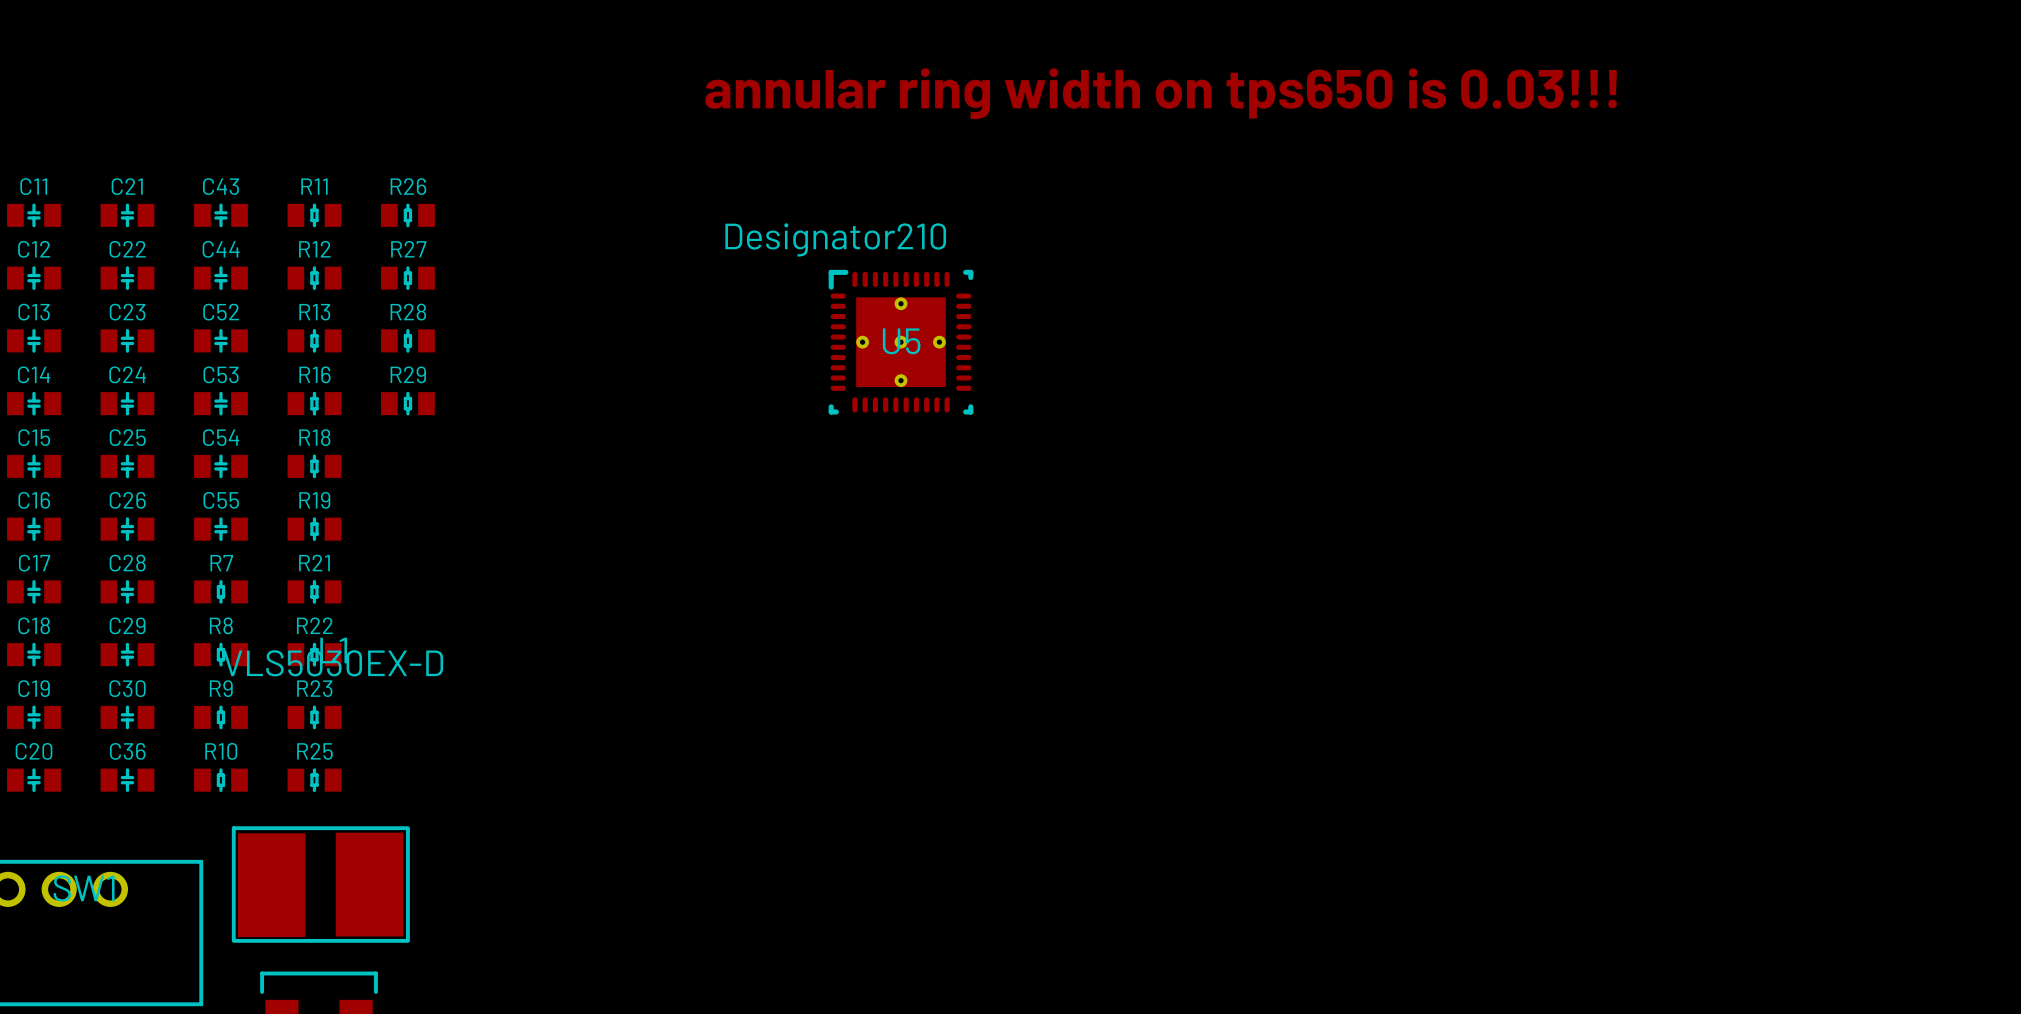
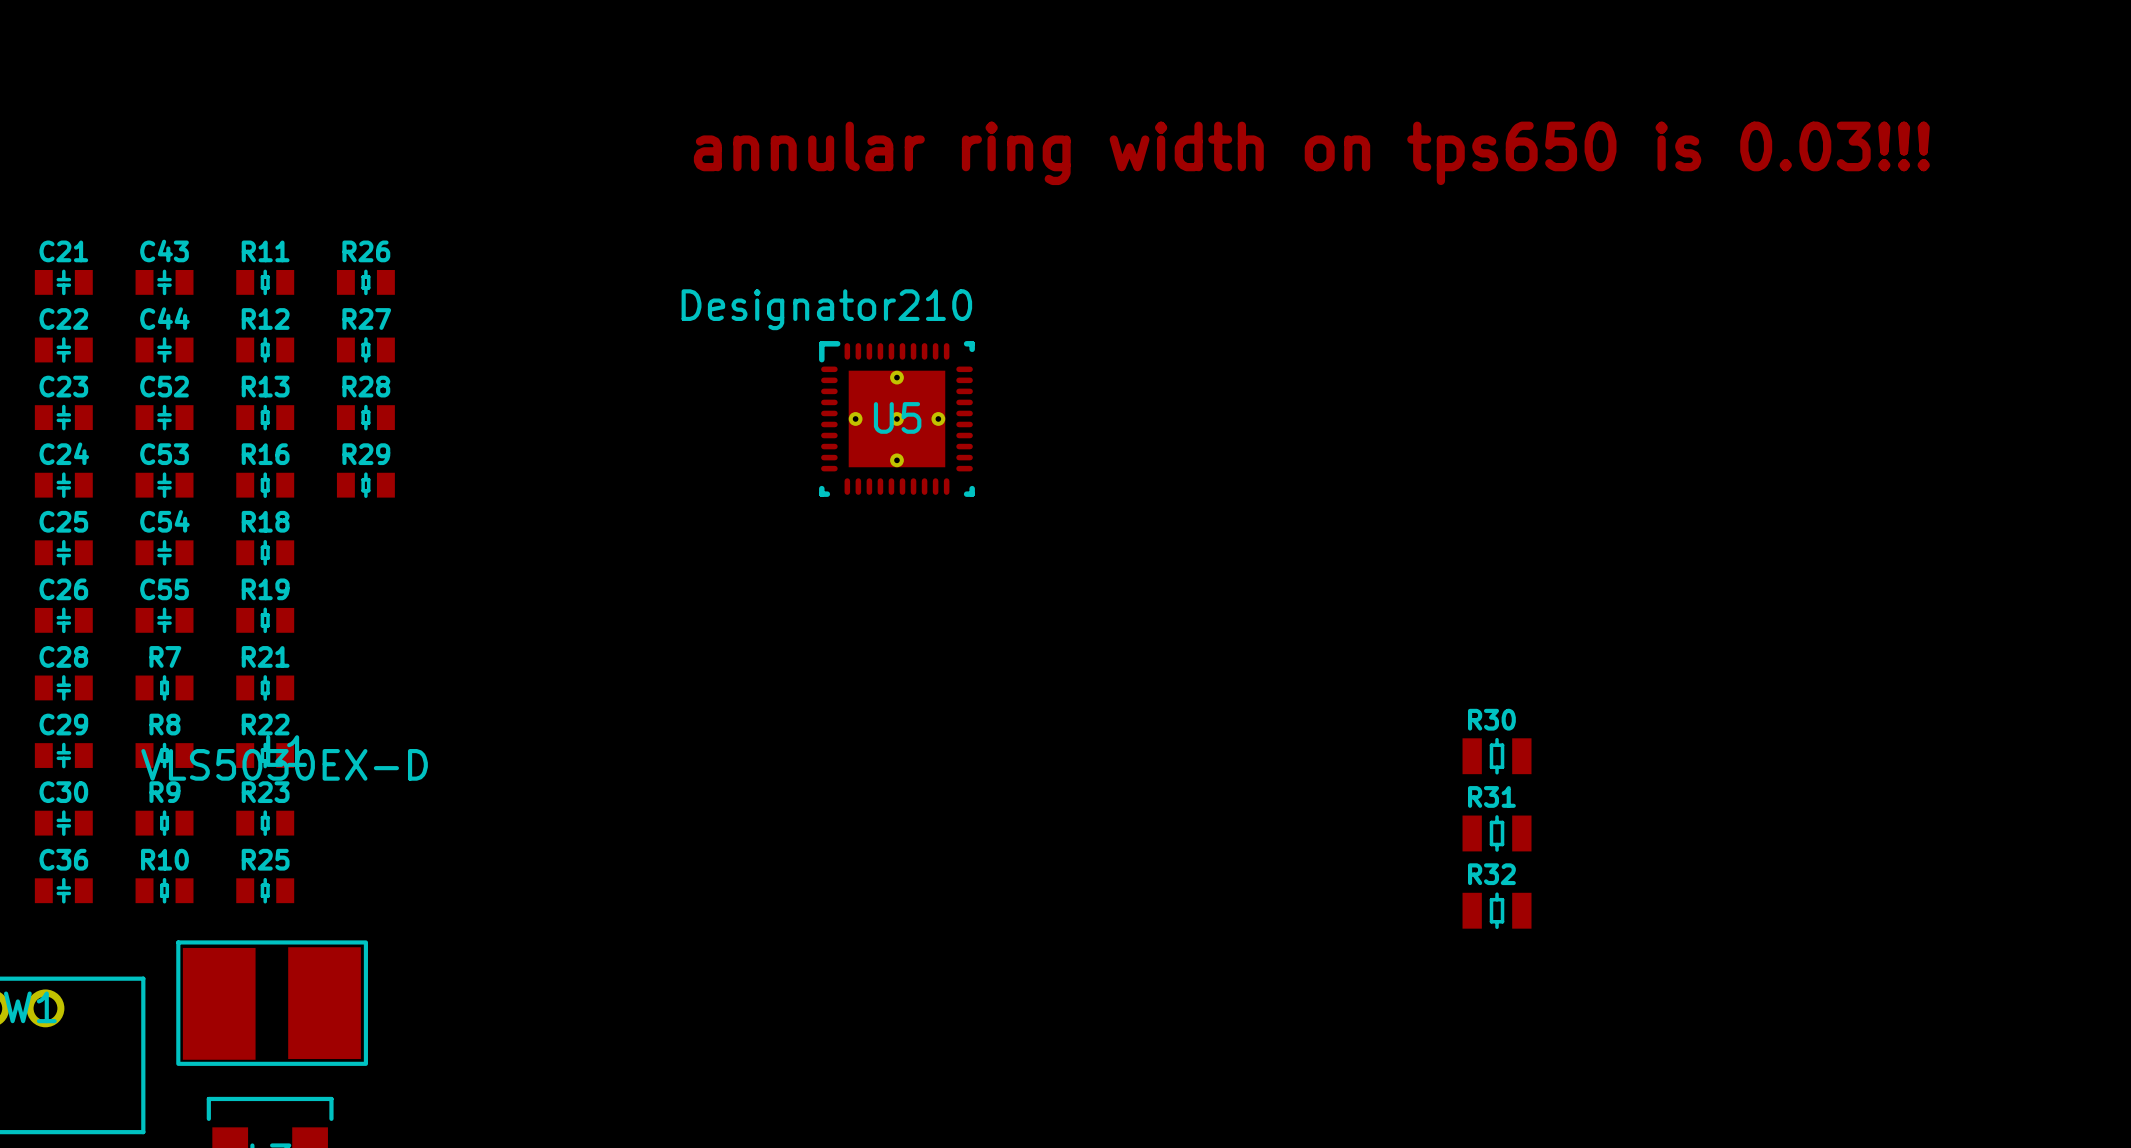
R30: none -> (1497, 756)
R31: none -> (1497, 833)
R32: none -> (1497, 910)

